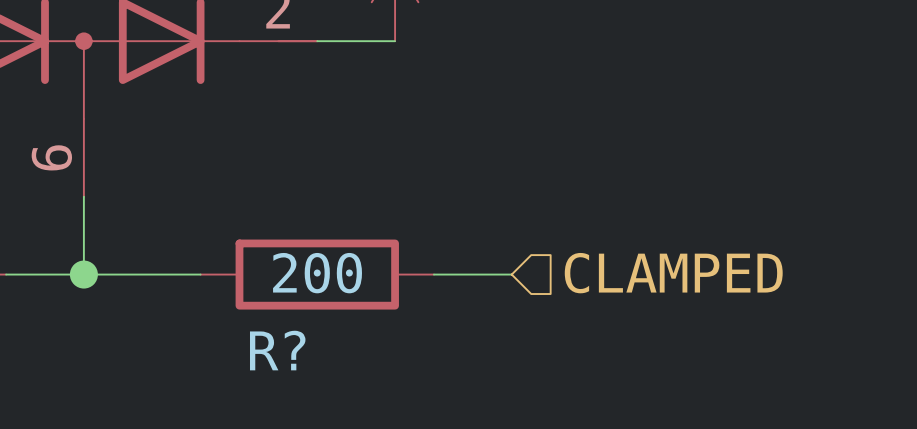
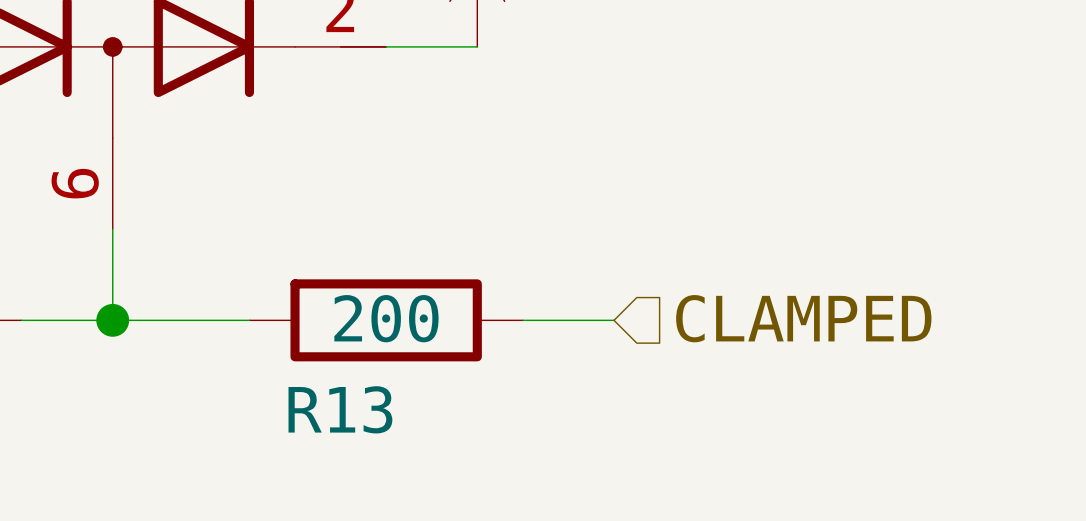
R? name: R? (277, 350) -> R13 (340, 409)

